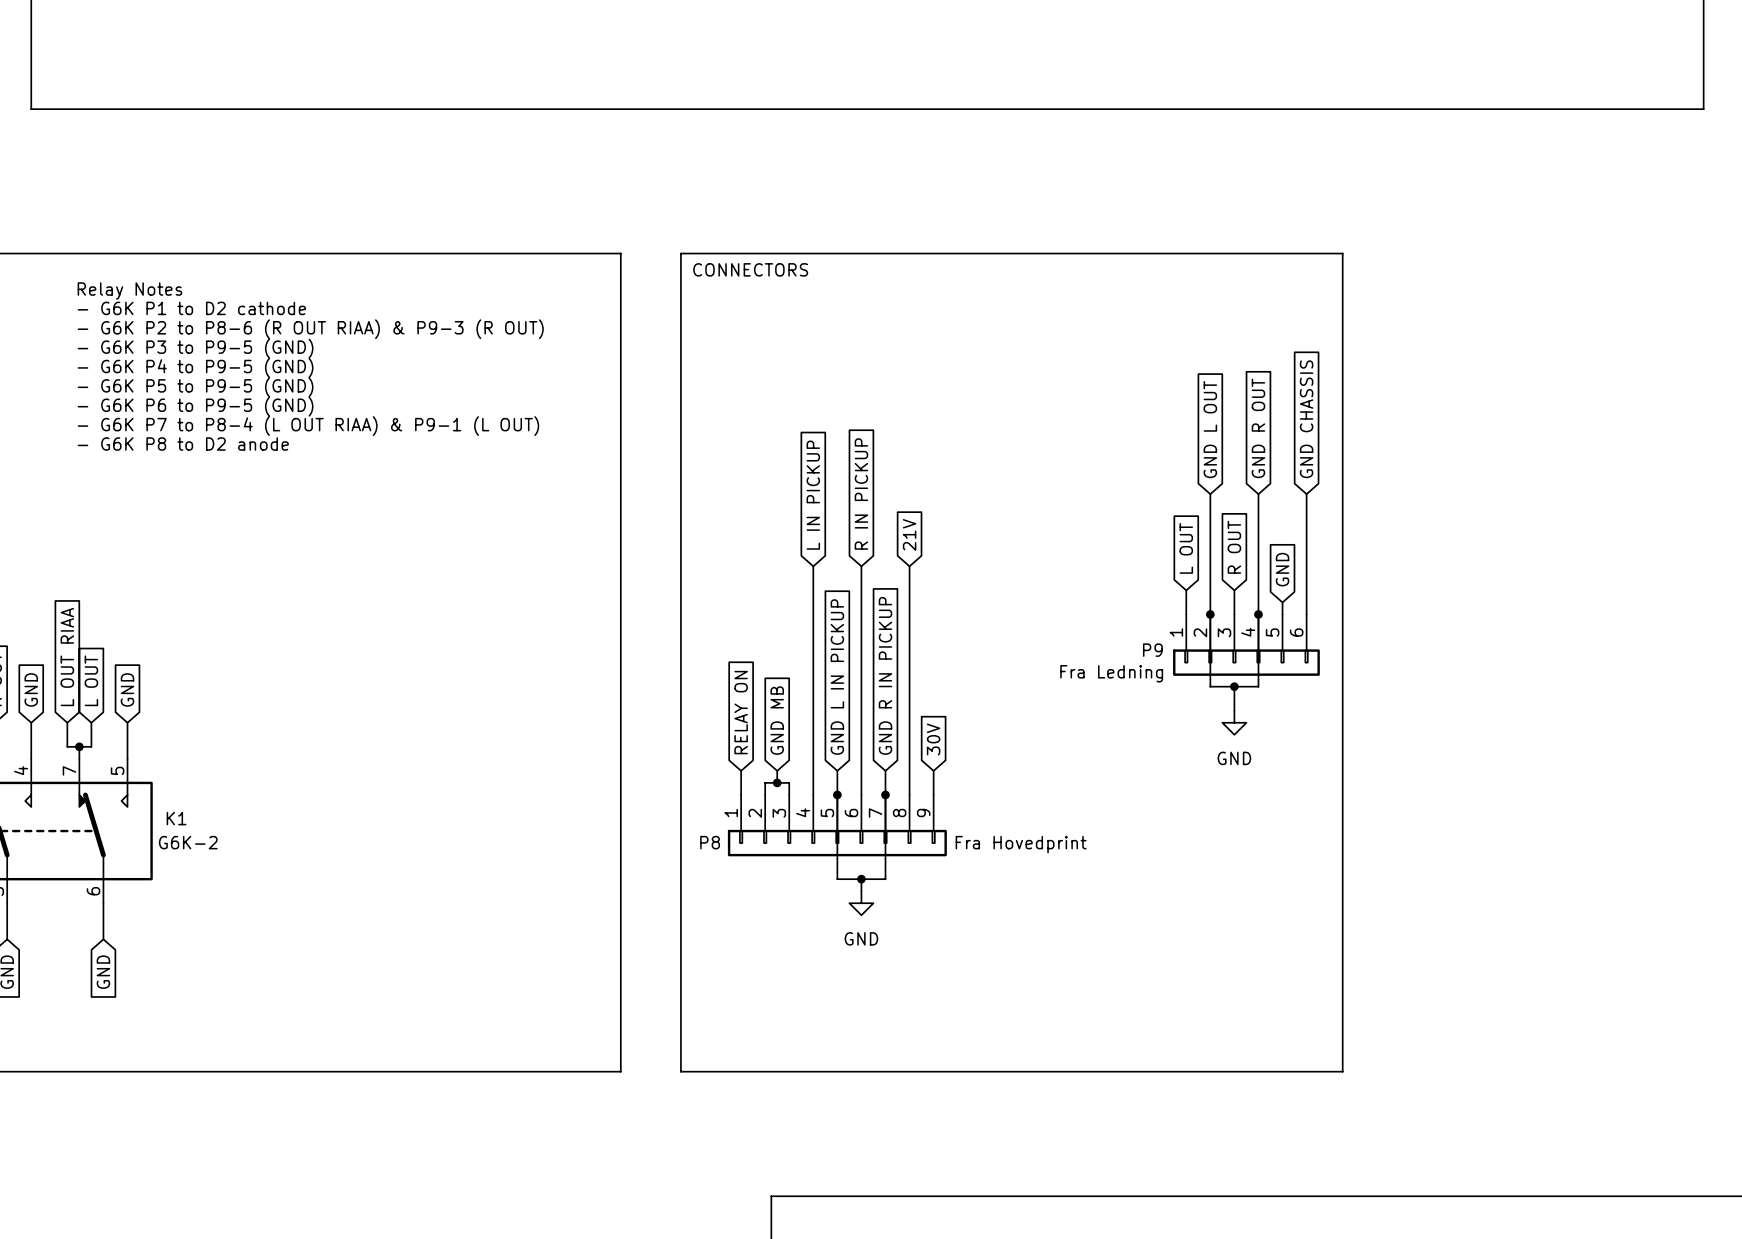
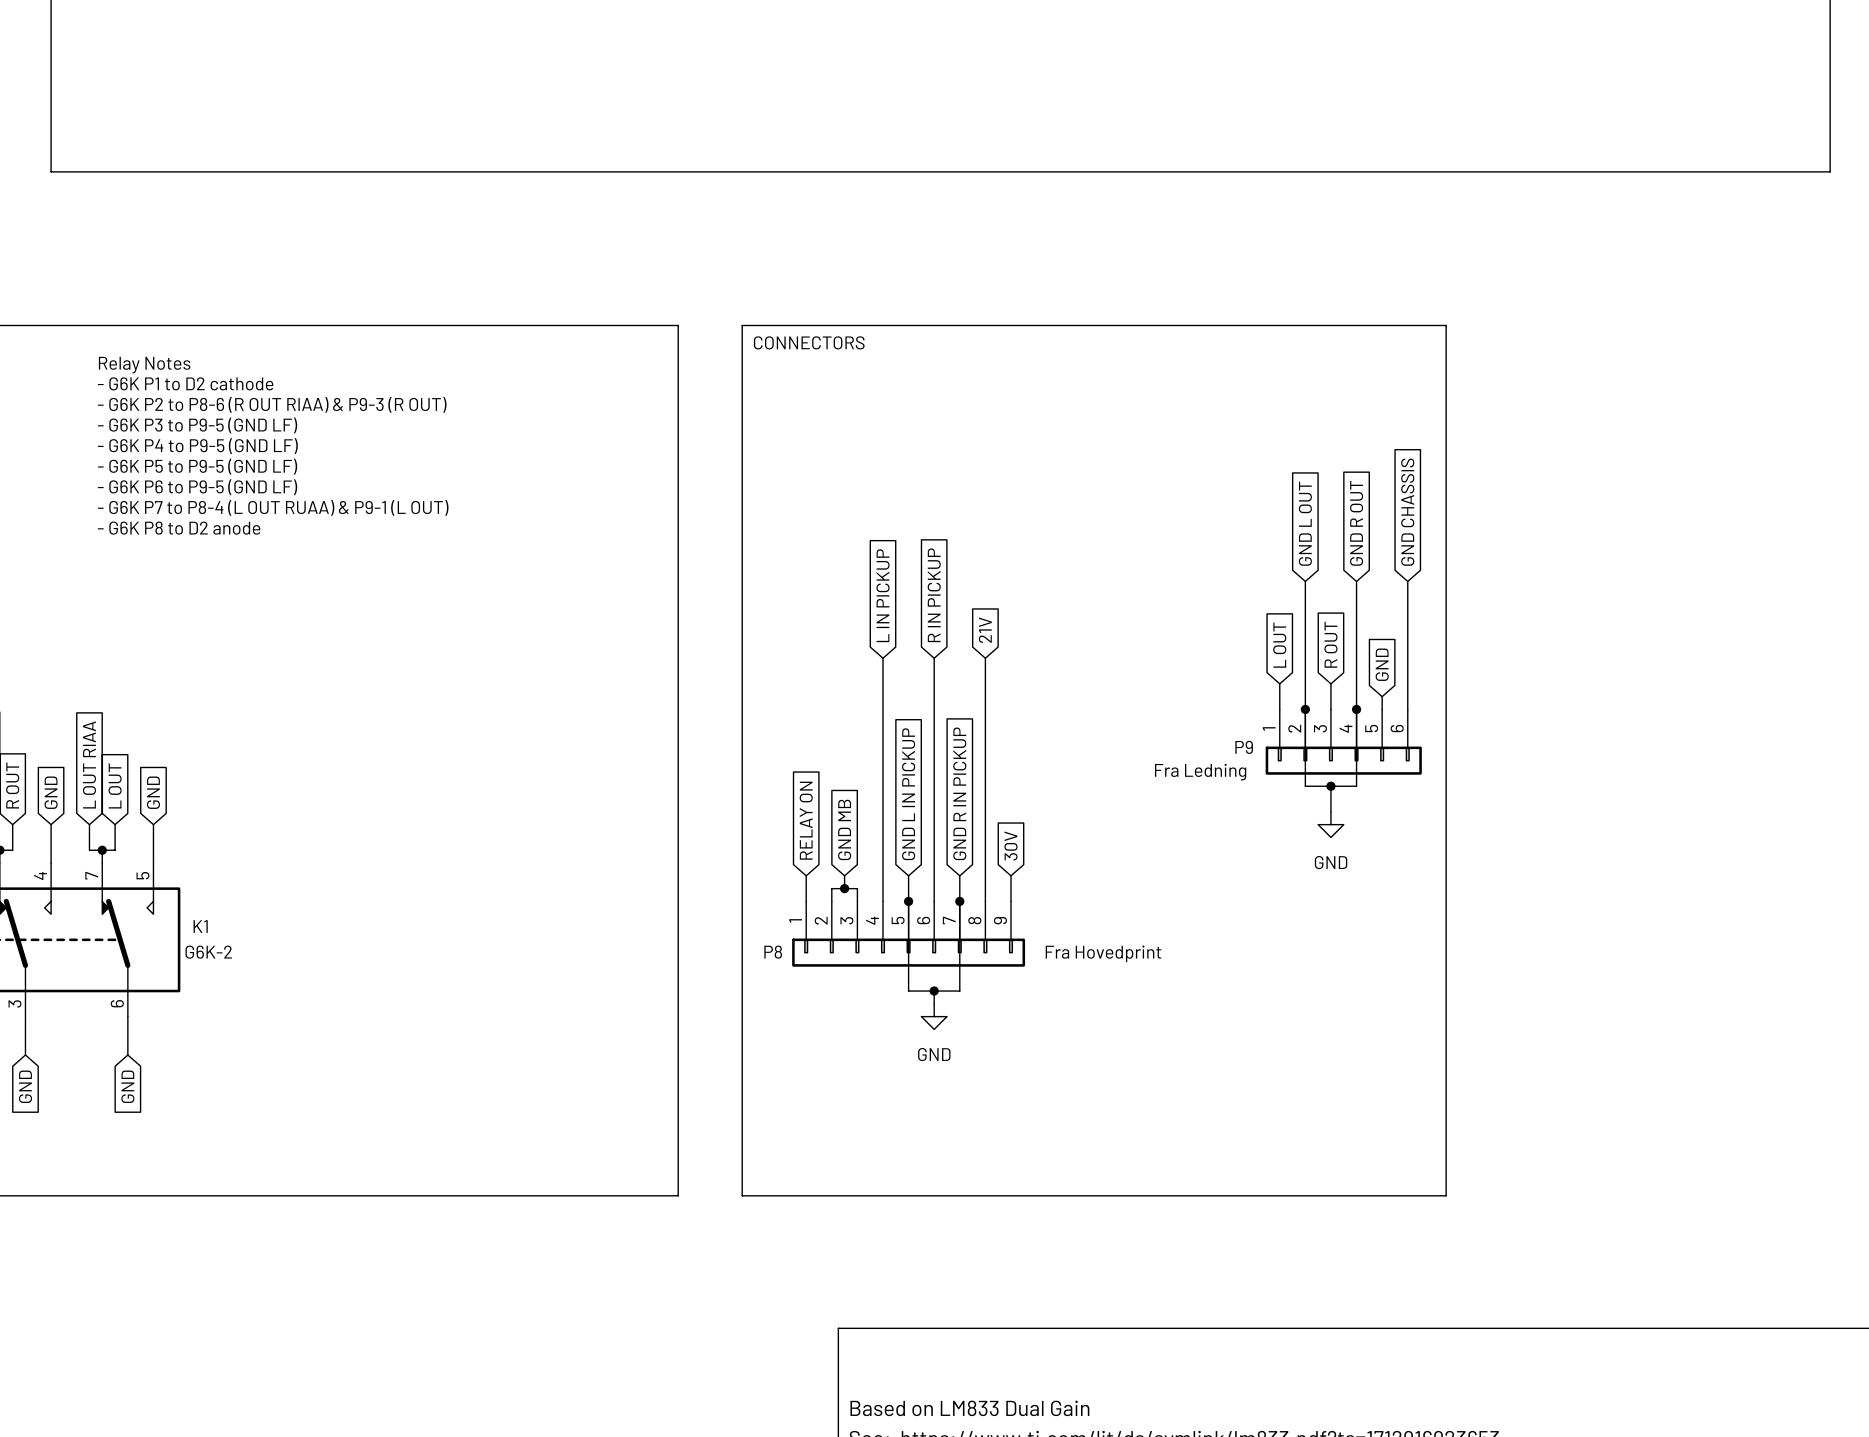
text: - G6K P3 to P9-5 (GND) (195, 348) -> - G6K P3 to P9-5 (GND LF) (197, 425)
text: - G6K P4 to P9-5 (GND) (195, 367) -> - G6K P4 to P9-5 (GND LF) (197, 446)
text: - G6K P5 to P9-5 (GND) (195, 387) -> - G6K P5 to P9-5 (GND LF) (197, 466)
text: - G6K P6 to P9-5 (GND) (195, 406) -> - G6K P6 to P9-5 (GND LF) (197, 487)
text: - G6K P7 to P8-4 (L OUT RIAA) & P9-1 (L OUT) (308, 426) -> - G6K P7 to P8-4 (L OUT RUAA) & P9-1 (L OUT) (273, 507)

